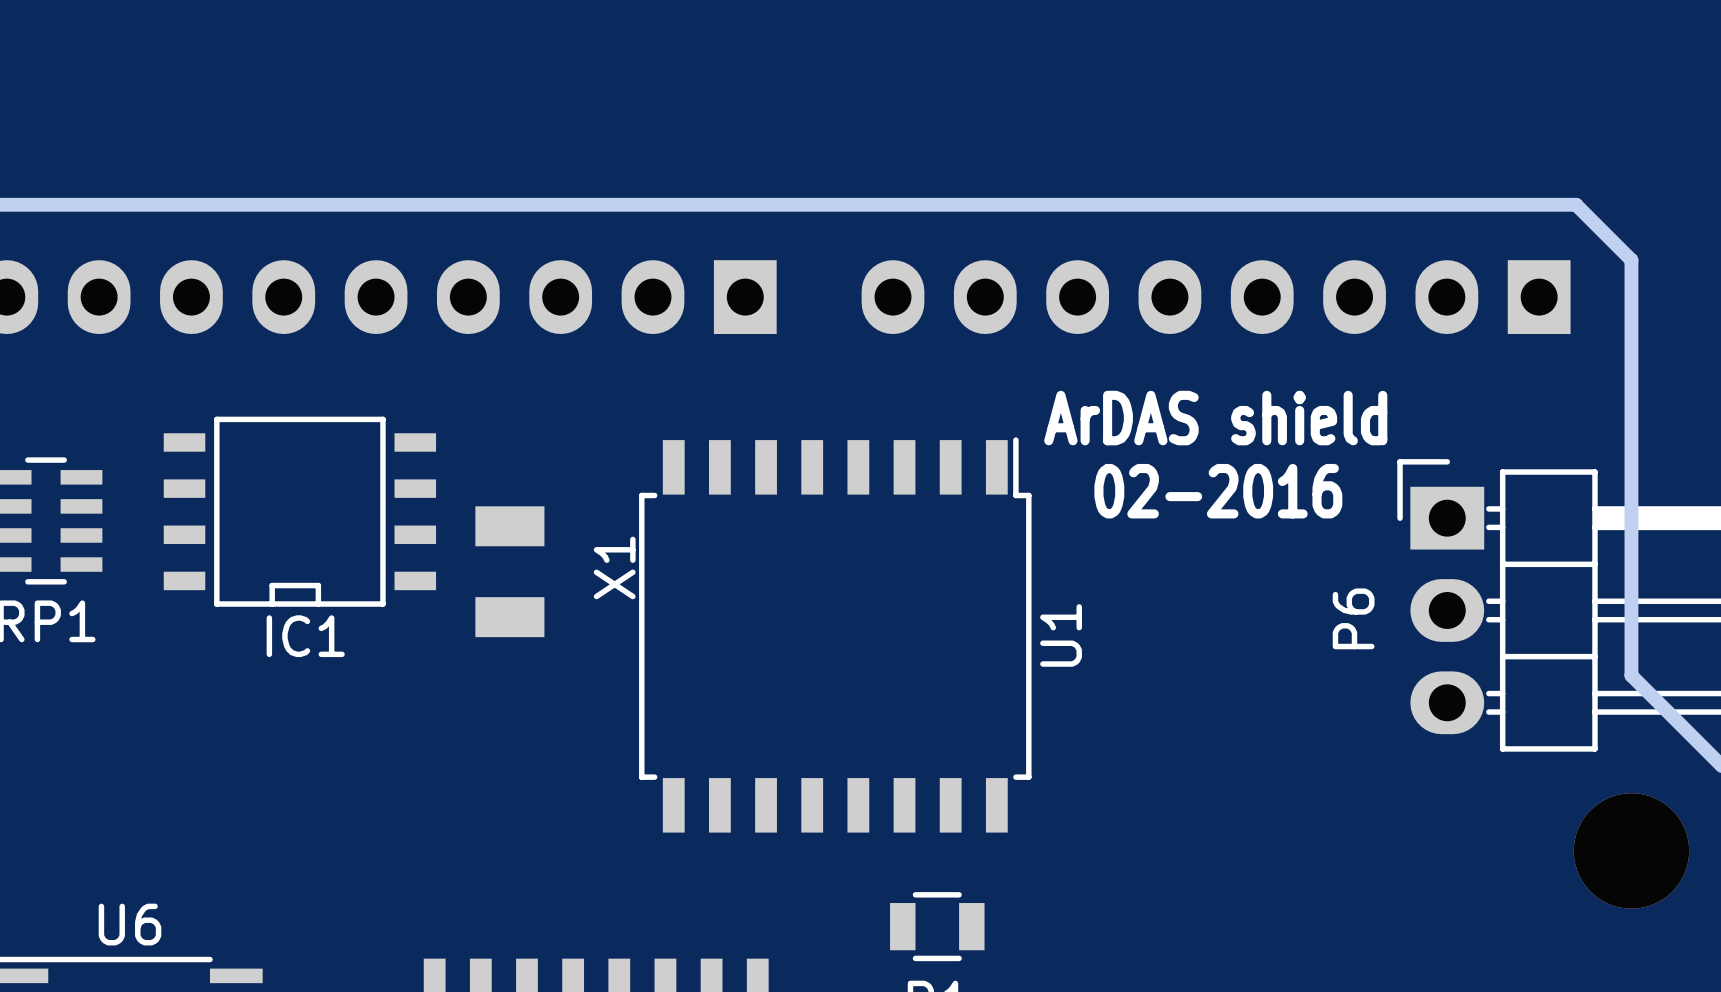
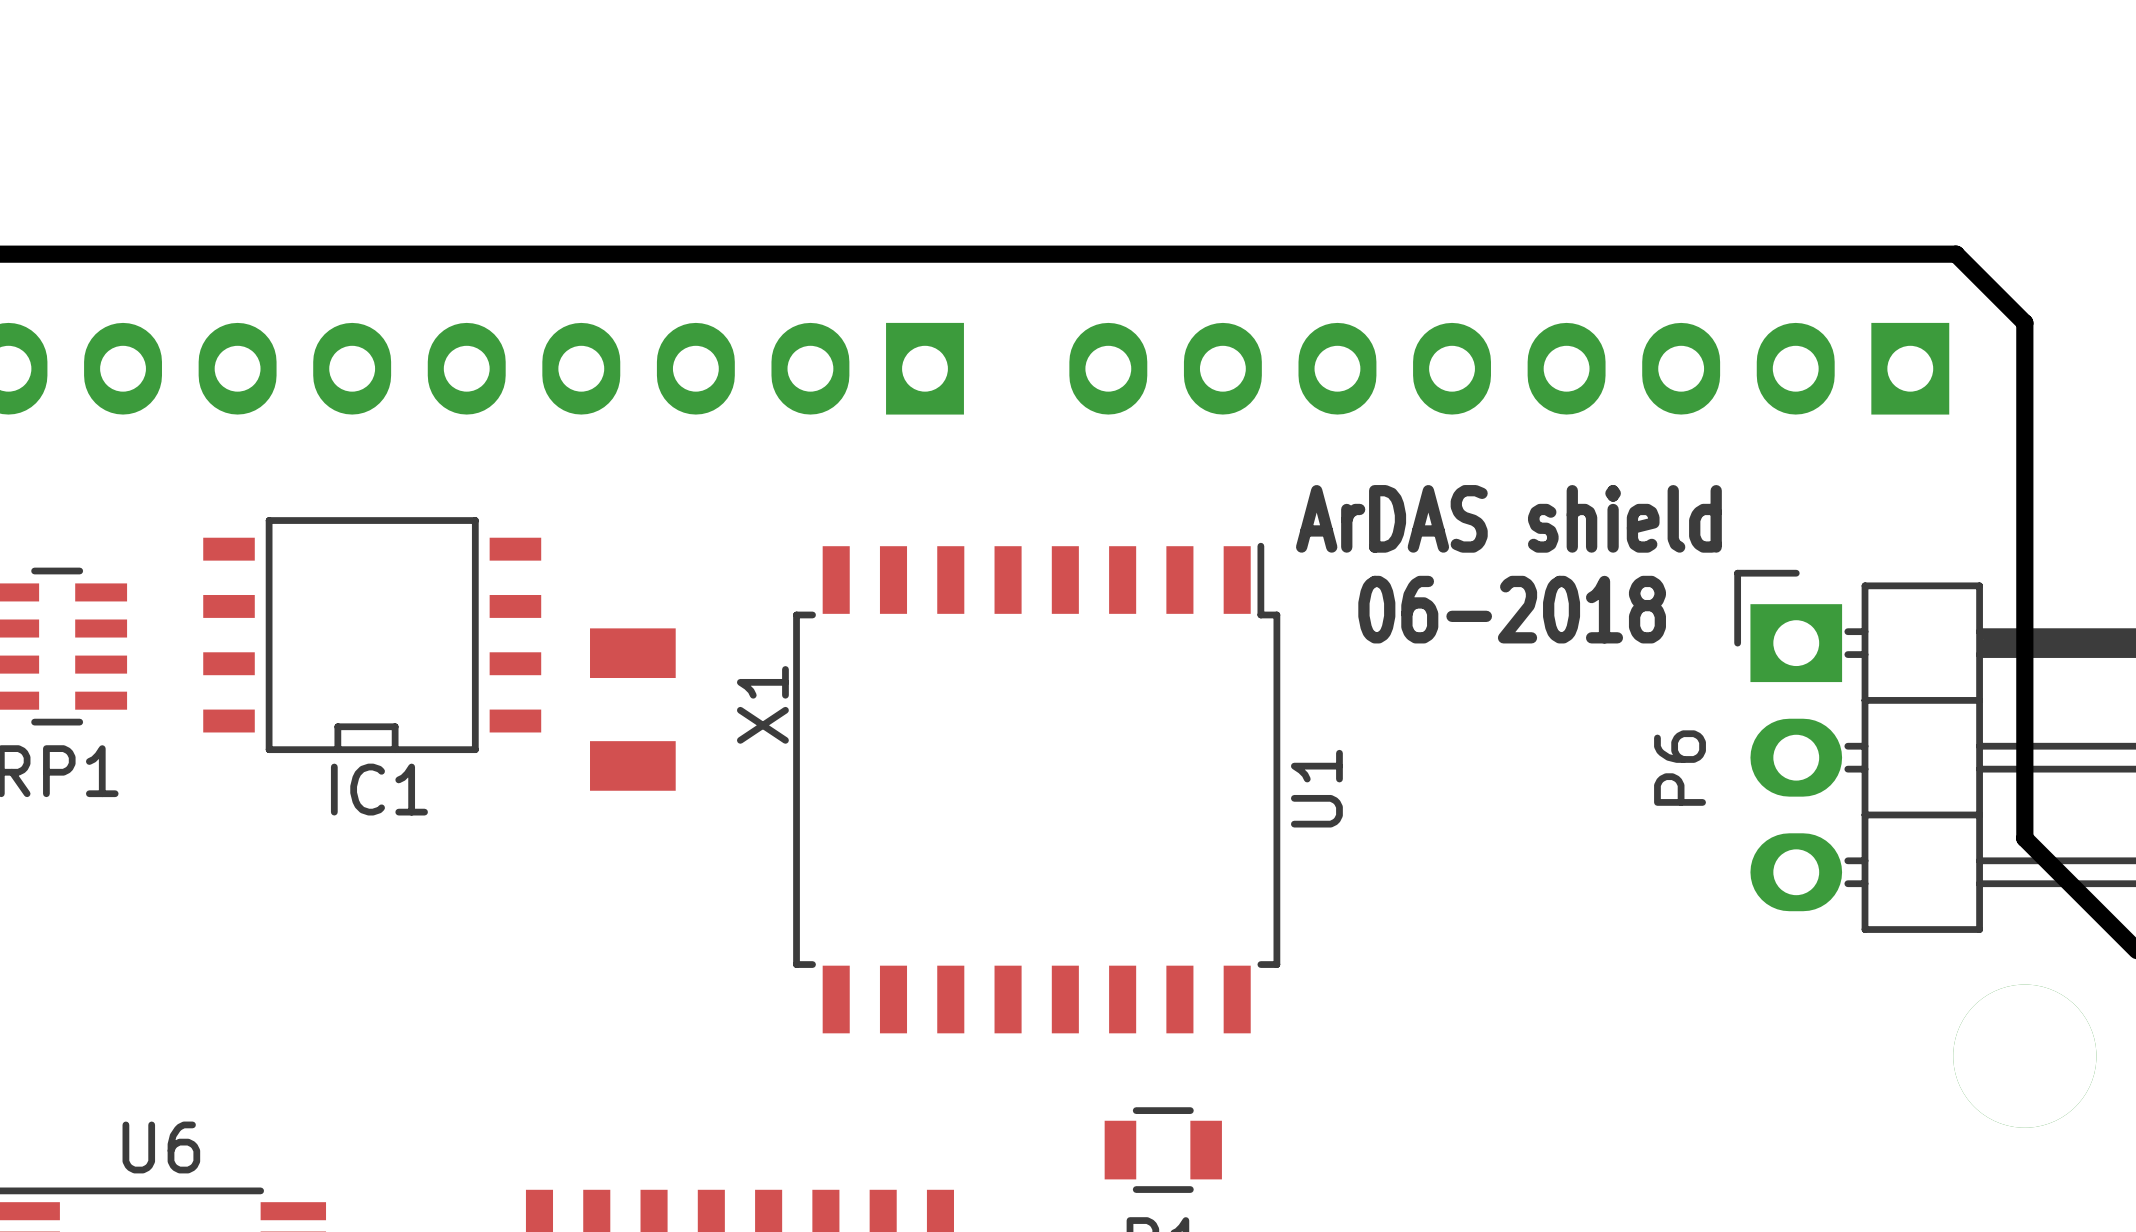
text: 02-2016 (1218, 491) -> 06-2018 (1512, 609)

